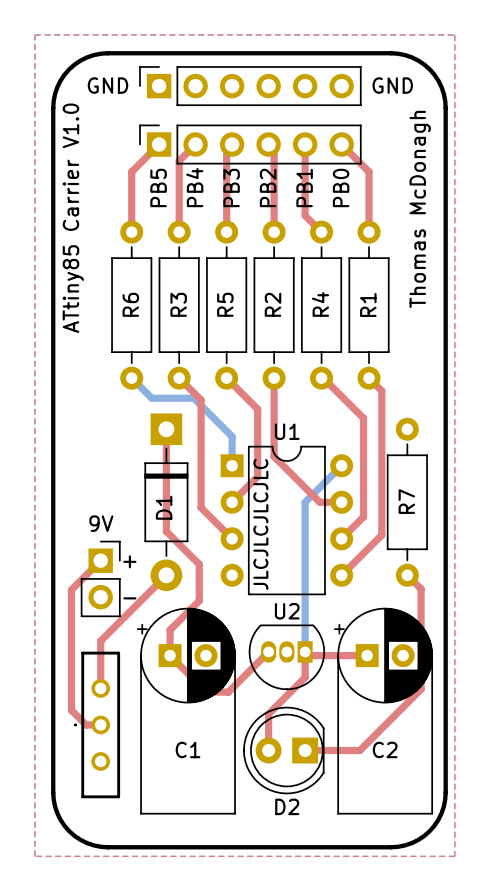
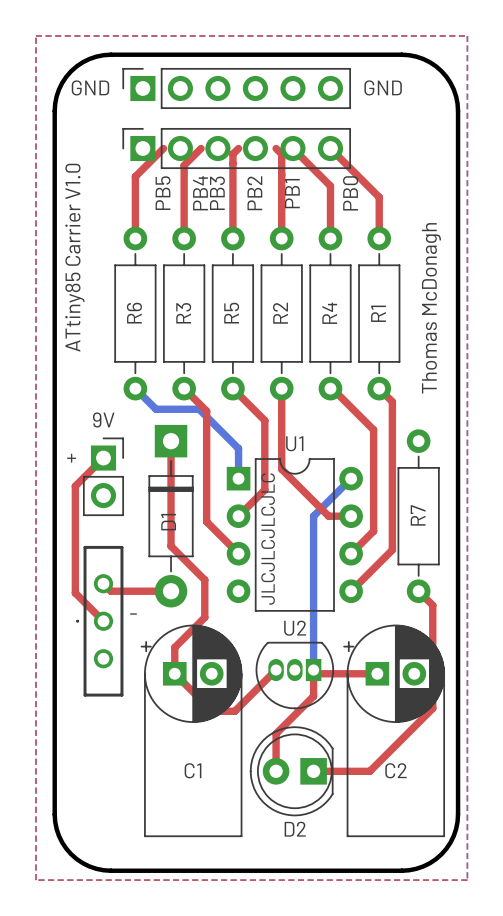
text position: GND (108, 85) -> GND (90, 87)
text position: GND (392, 85) -> GND (383, 87)
part position: (250, 86) -> (236, 88)
part position: (250, 144) -> (236, 148)
top track: (305, 144) (305, 215) (321, 232) -> (292, 148) (330, 186) (330, 238)
top track: (341, 144) (369, 171) (369, 191) -> (330, 148) (379, 197)
text position: PB3 (231, 187) -> PB3 (217, 193)
text position: PB2 (268, 187) -> PB2 (254, 193)
text position: PB1 (304, 187) -> PB1 (292, 193)
text position: Thomas McDonagh (420, 209) -> Thomas McDonagh (431, 308)
text position: ATtiny85 Carrier V1.0 (73, 218) -> ATtiny85 Carrier V1.0 (74, 257)
top track: none -> (103, 458) (75, 486) (75, 593) (103, 621)
text position: 9V (101, 523) -> 9V (103, 419)
top track: (100, 560) (71, 589) (71, 710) (86, 724) (100, 724) -> none
text position: + (129, 561) -> + (71, 458)
top track: (166, 575) (100, 640) (100, 688) -> (171, 591) (110, 591) (103, 583)
part position: (100, 578) -> (103, 476)
part position: (97, 724) -> (99, 621)

